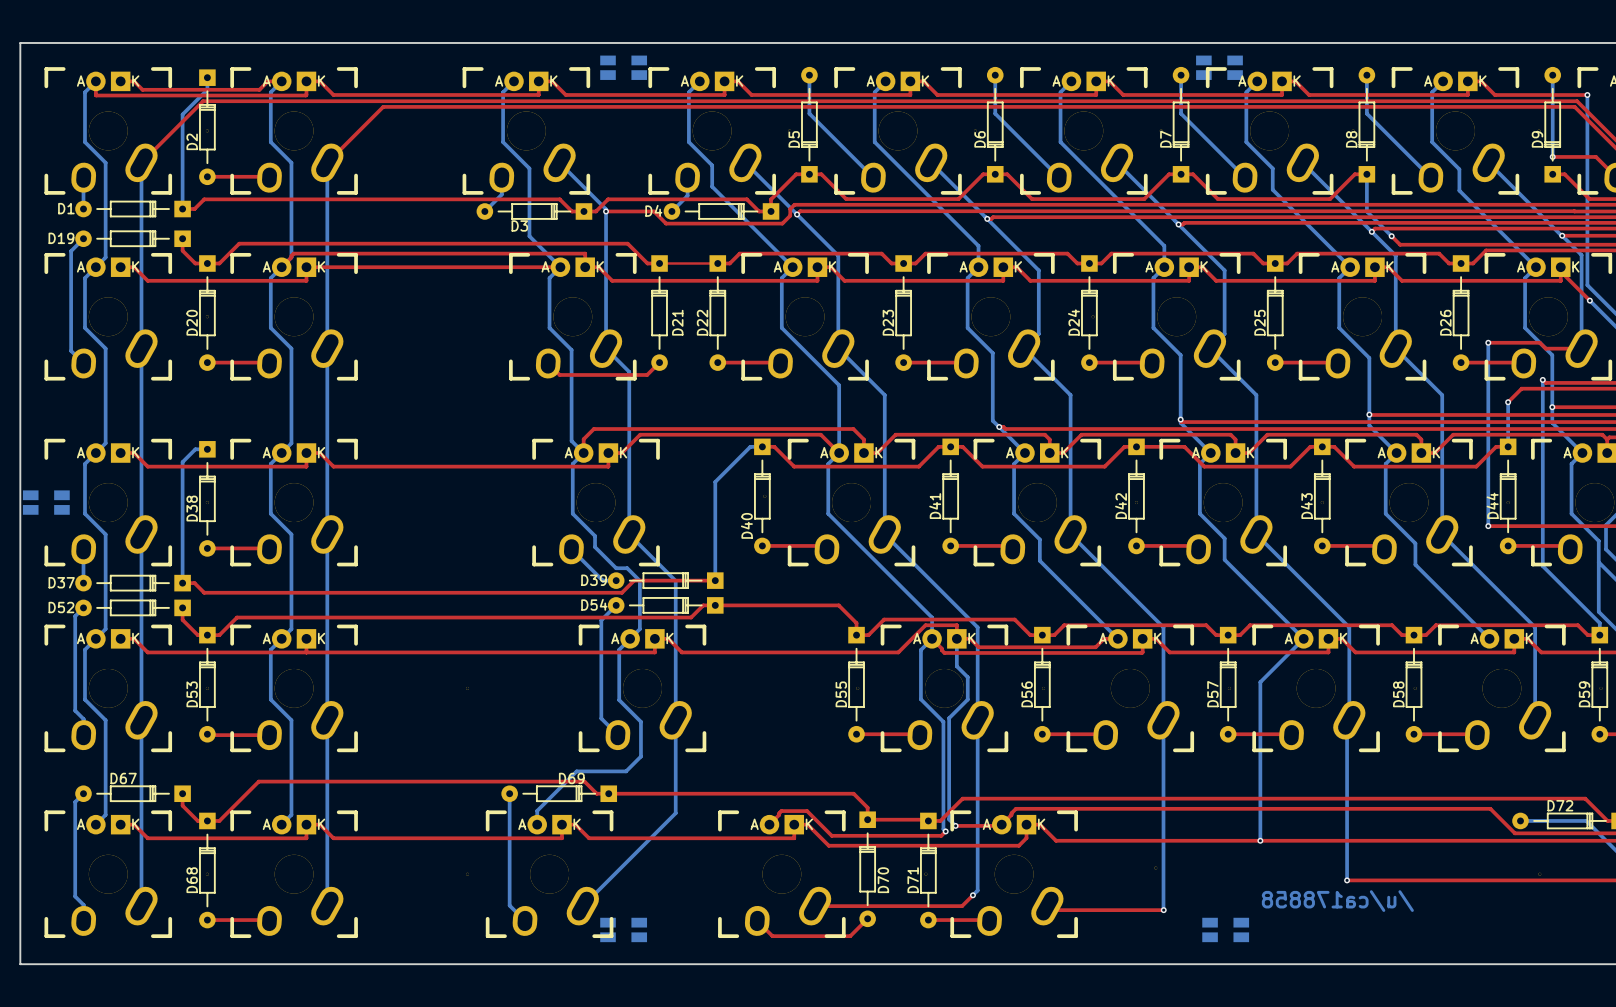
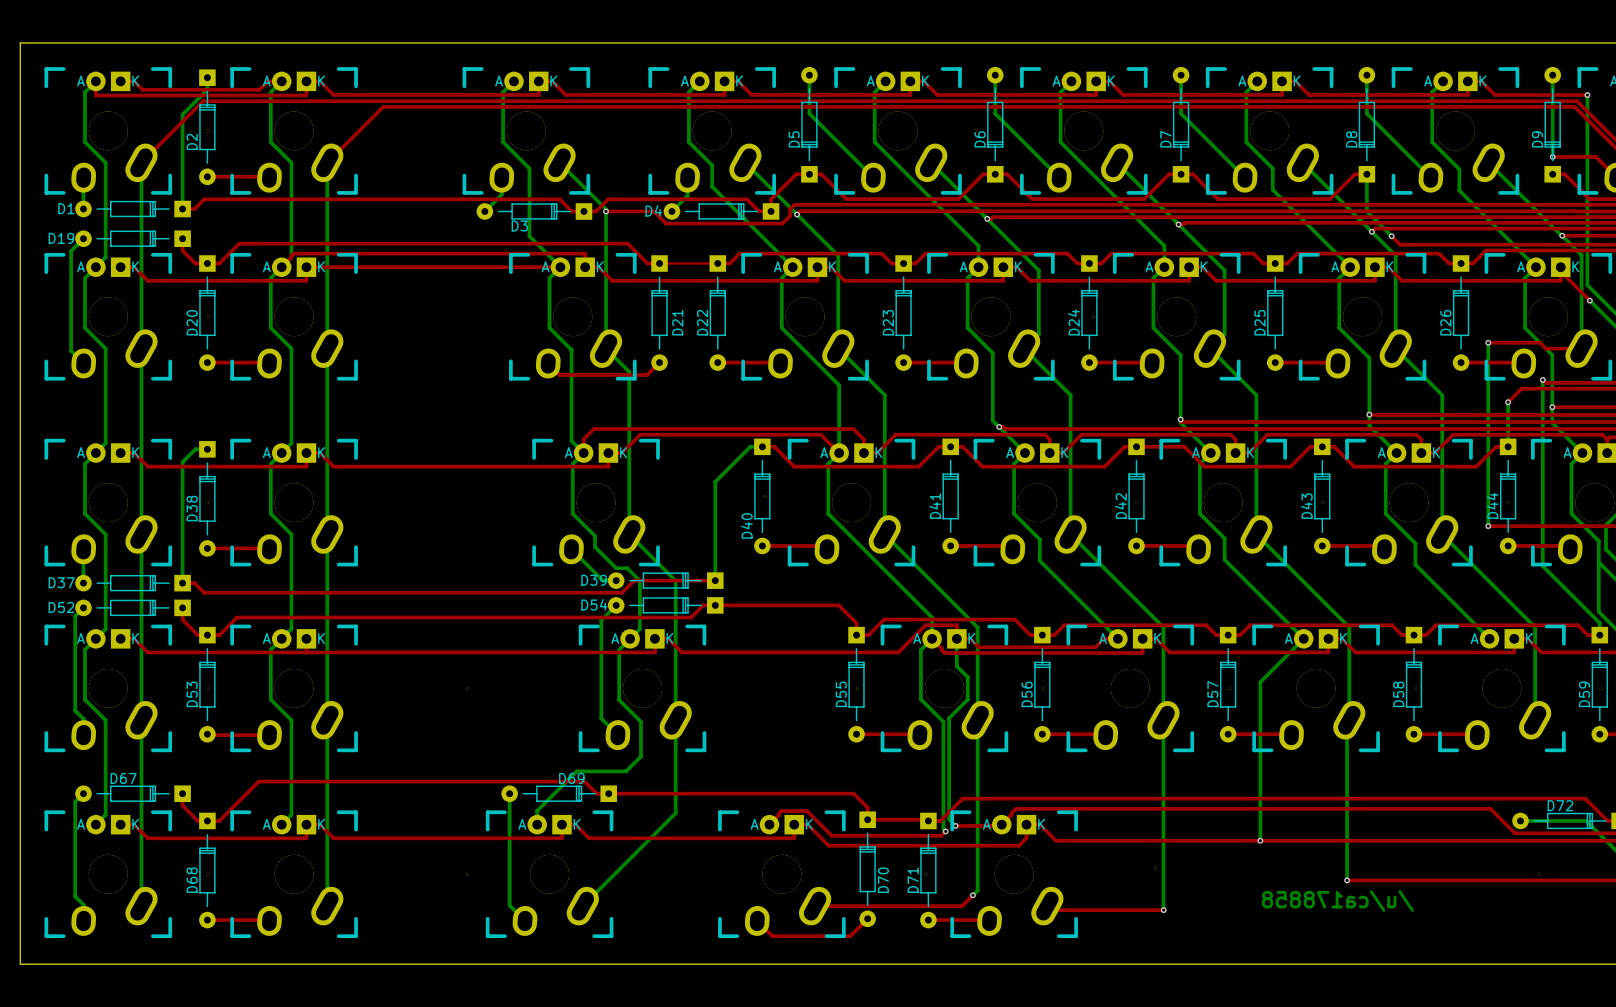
part: (623, 67) -> none
part: (1219, 67) -> none
part: (46, 502) -> none
part: (623, 929) -> none
part: (1225, 929) -> none

